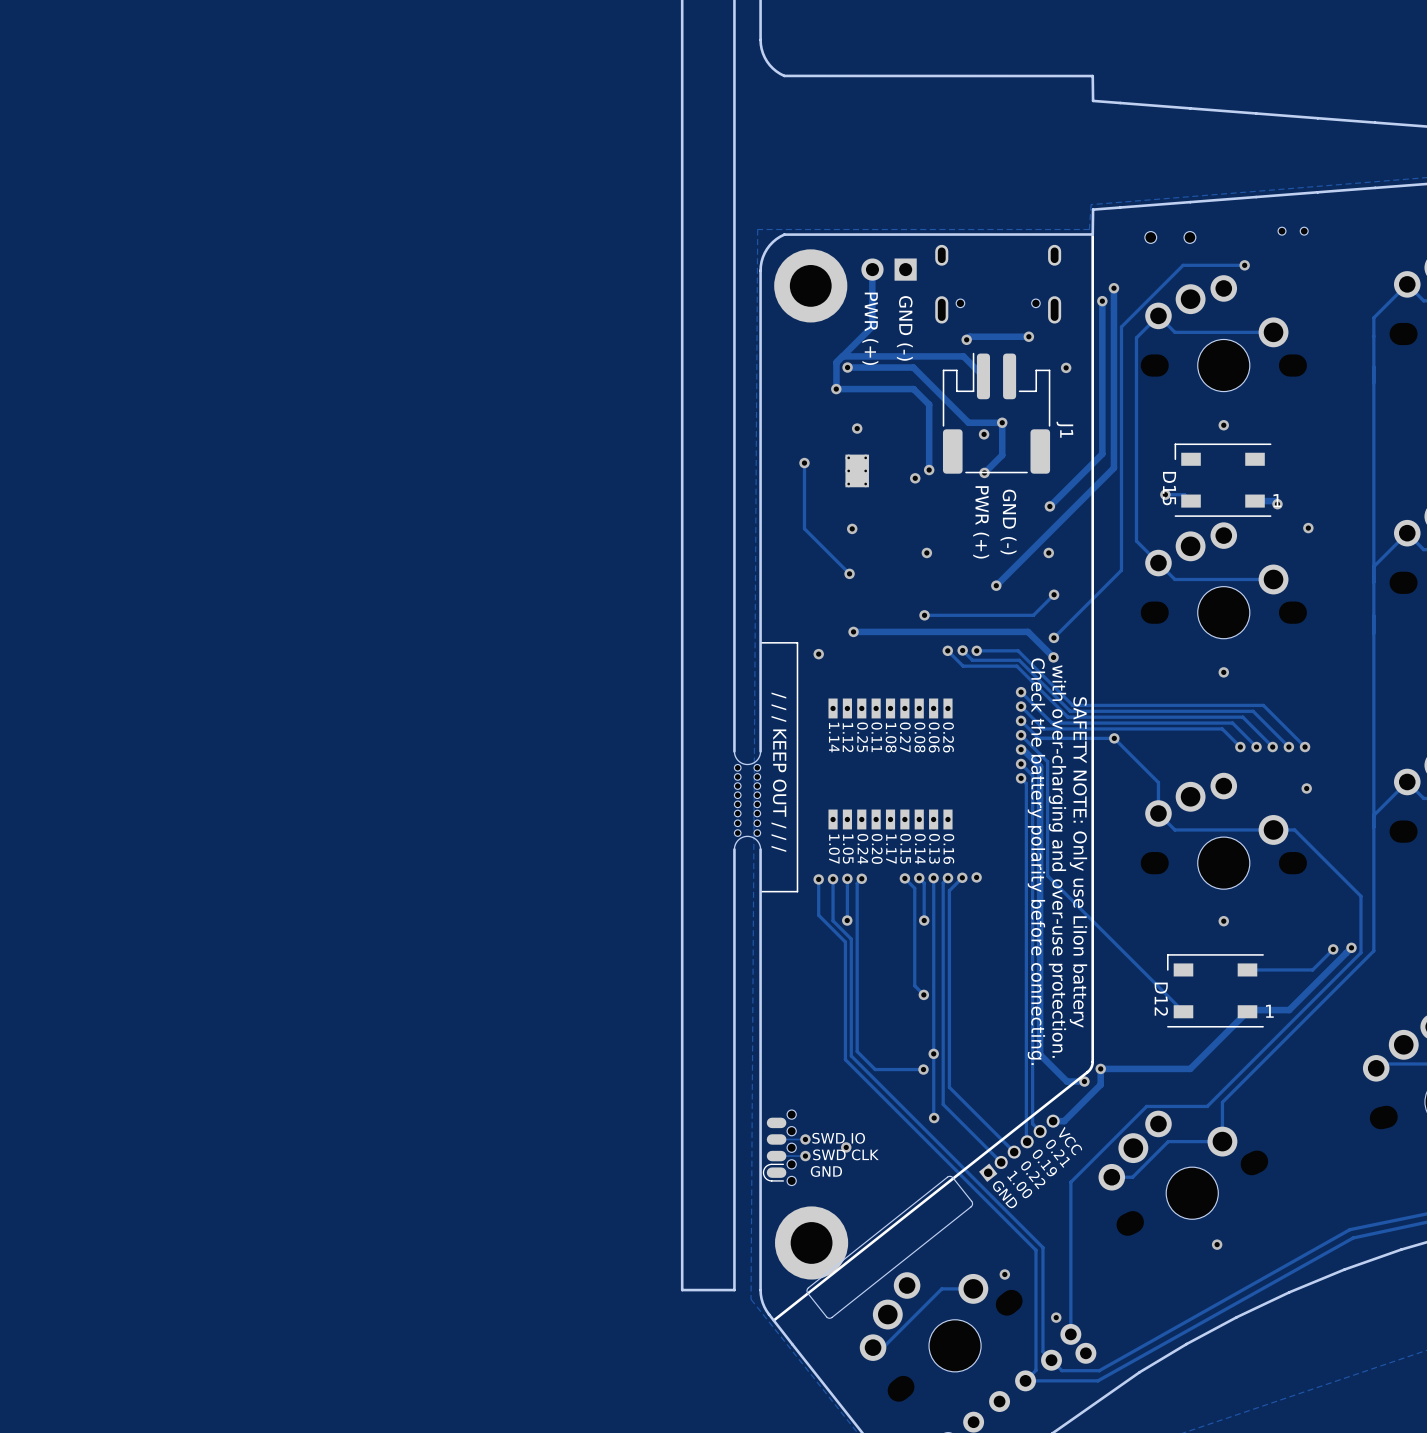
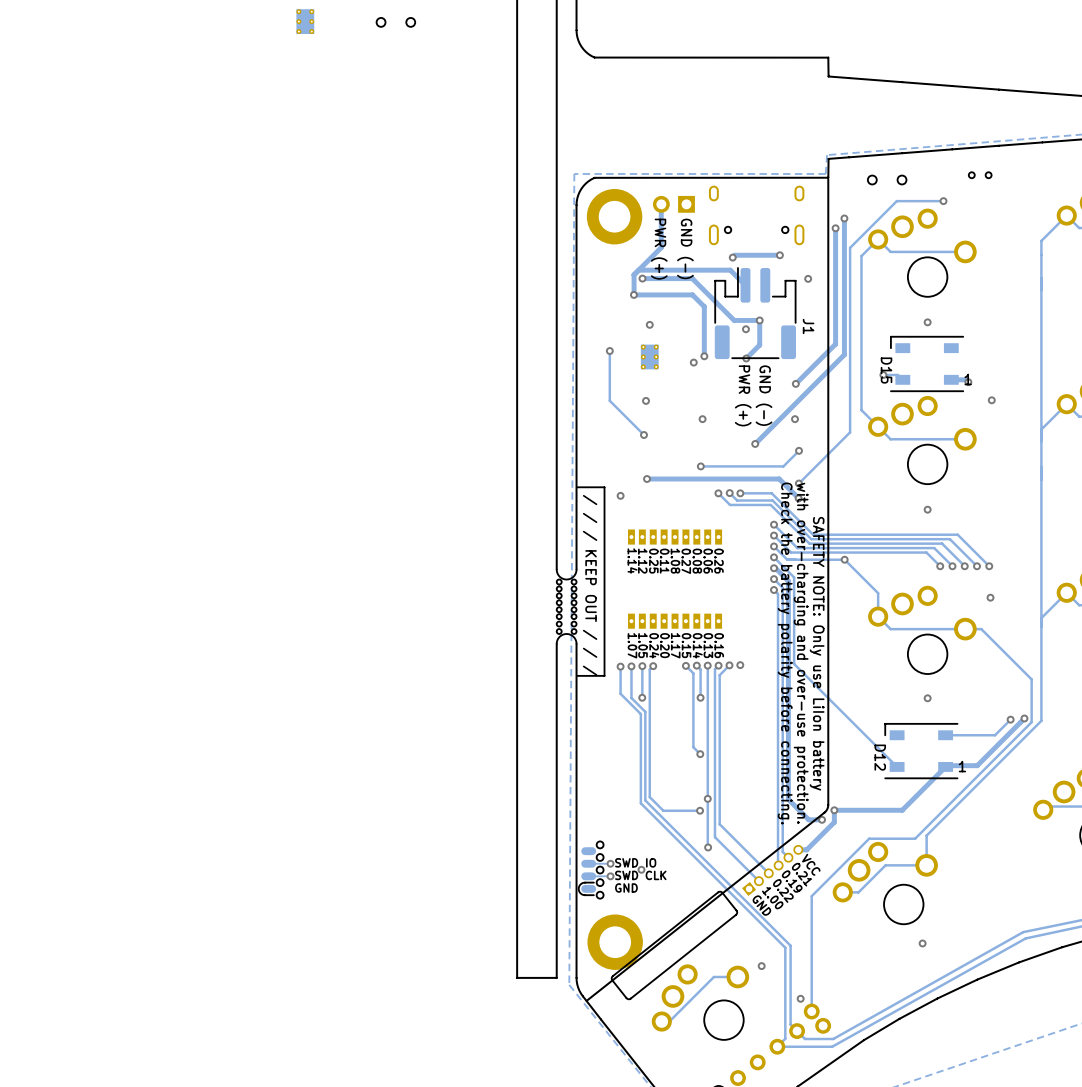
part: none -> (305, 21)
part: none -> (395, 22)

